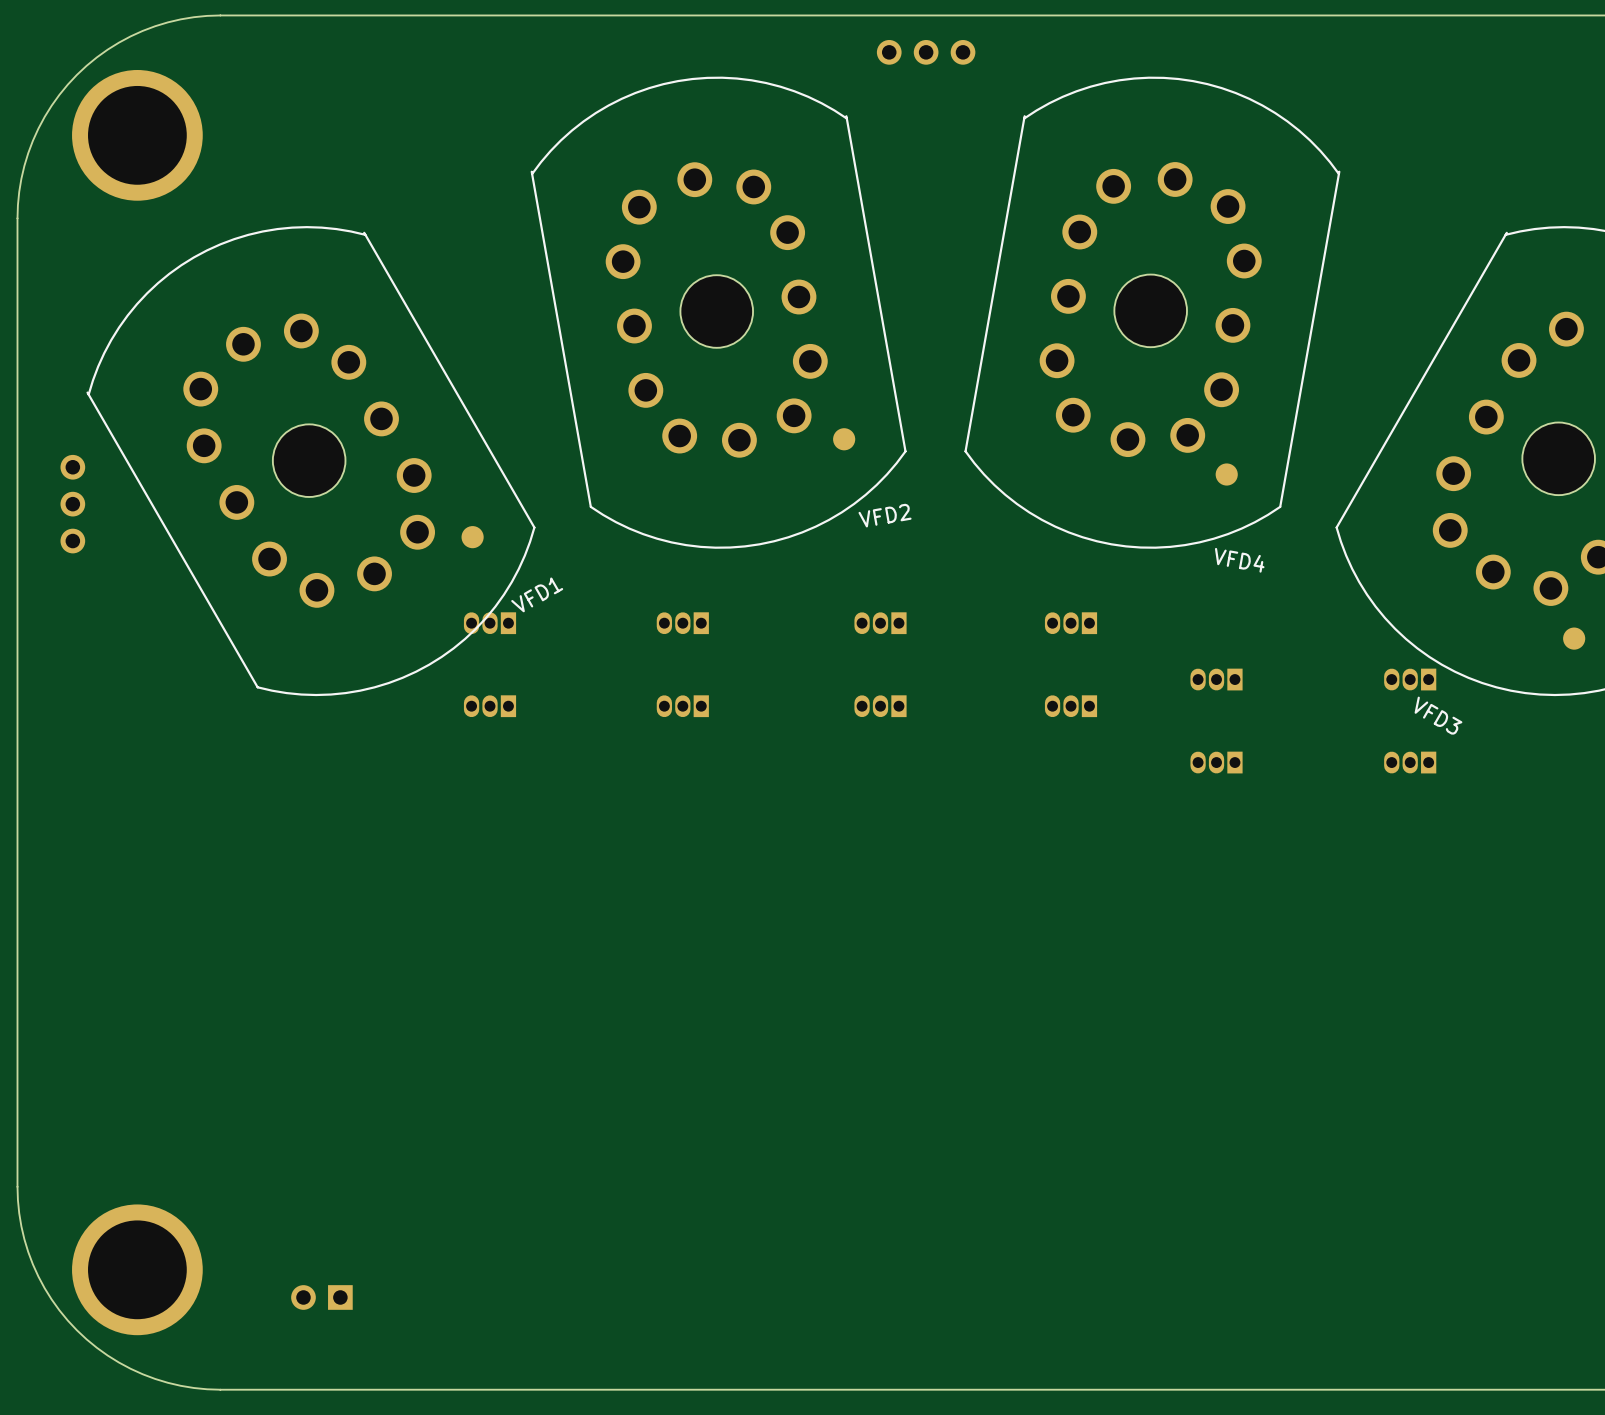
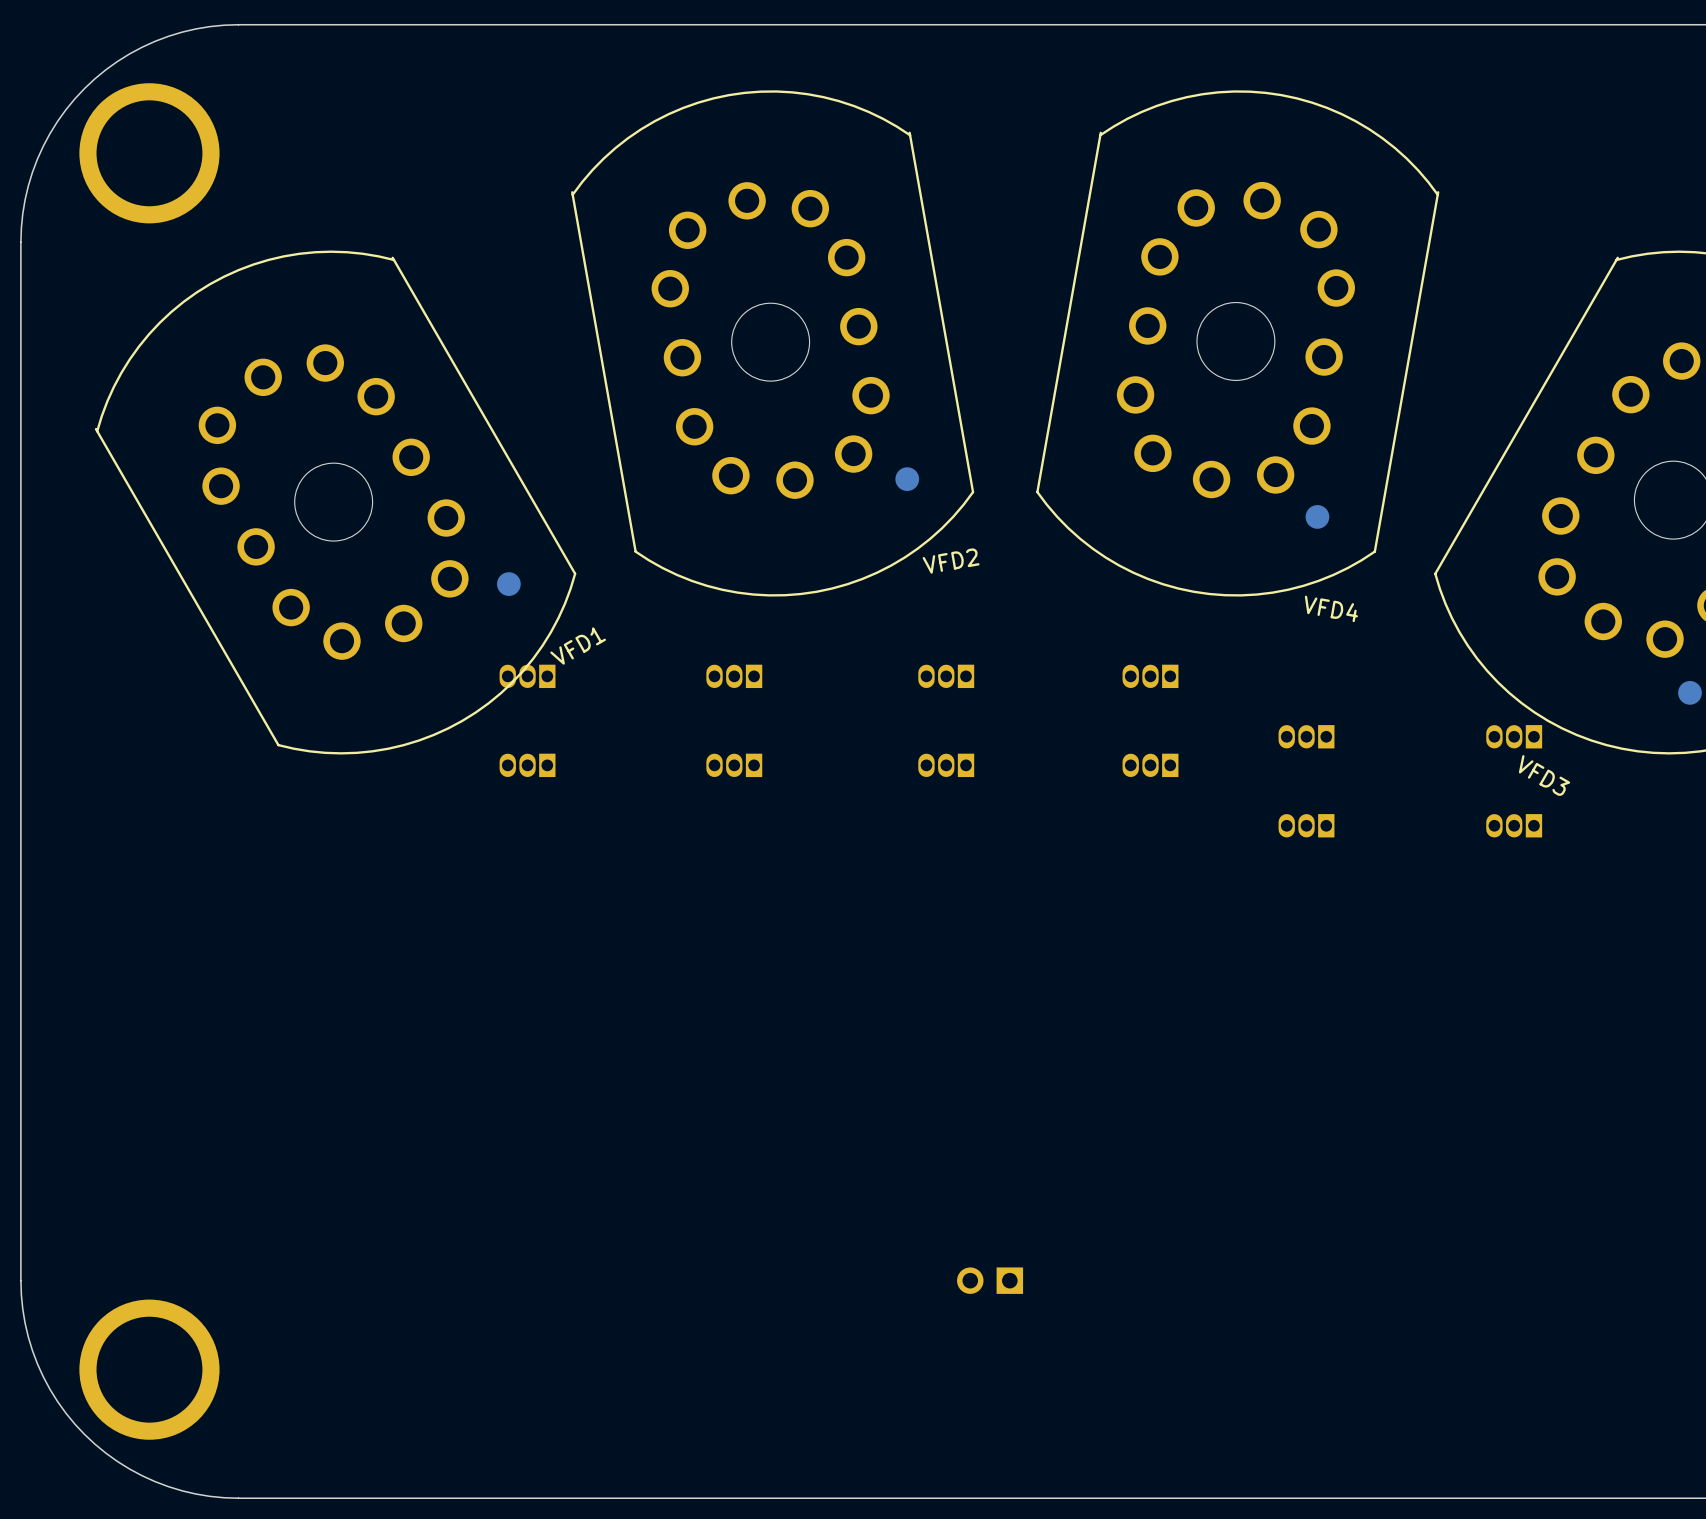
part: (926, 52) -> none
part: (72, 504) -> none
part: none -> (990, 1280)
part: (321, 1297) -> none

